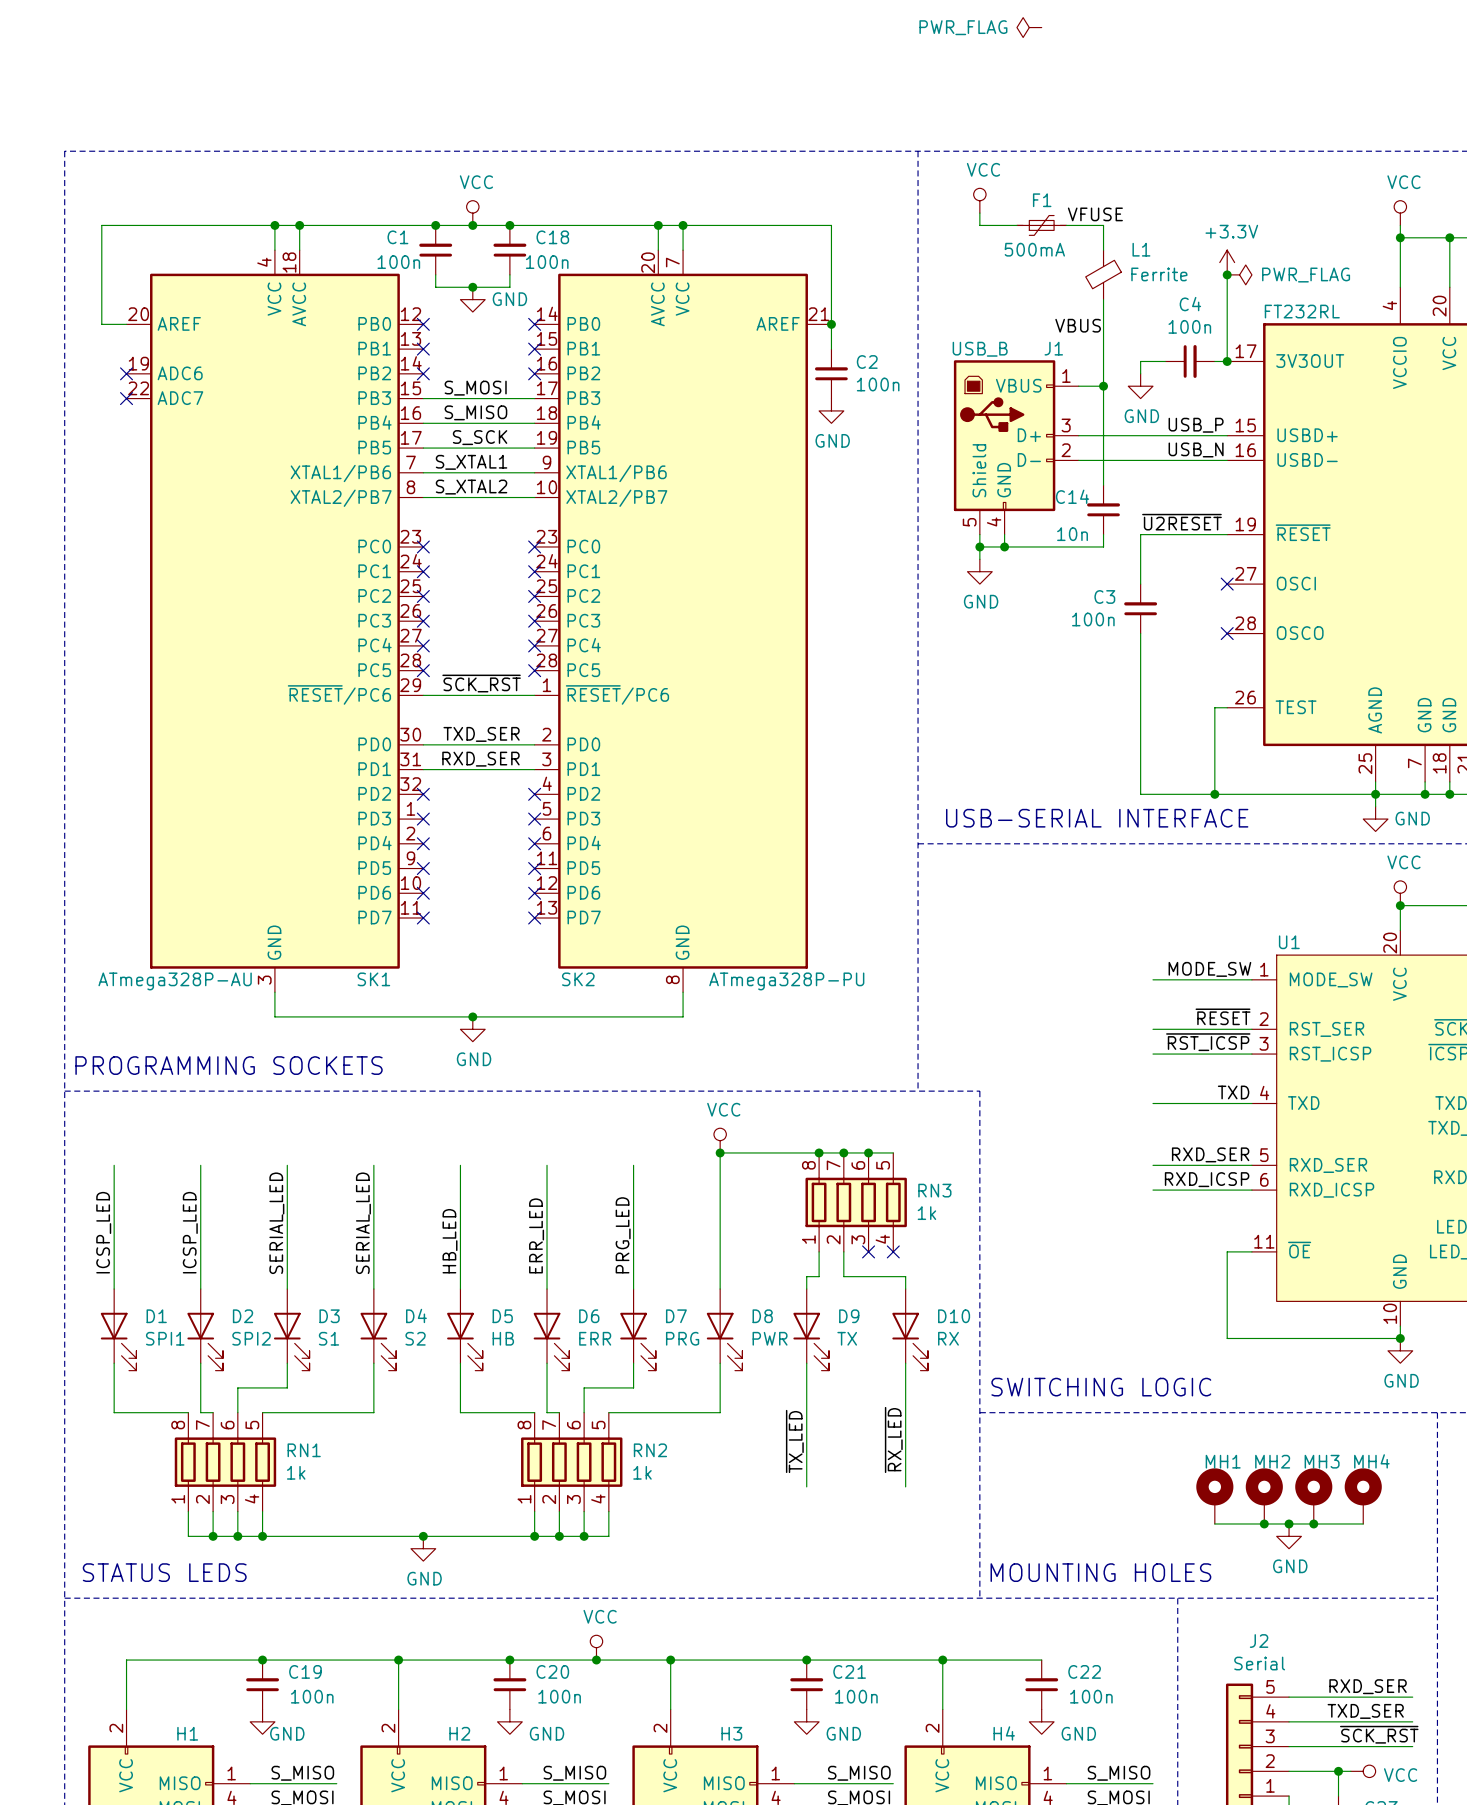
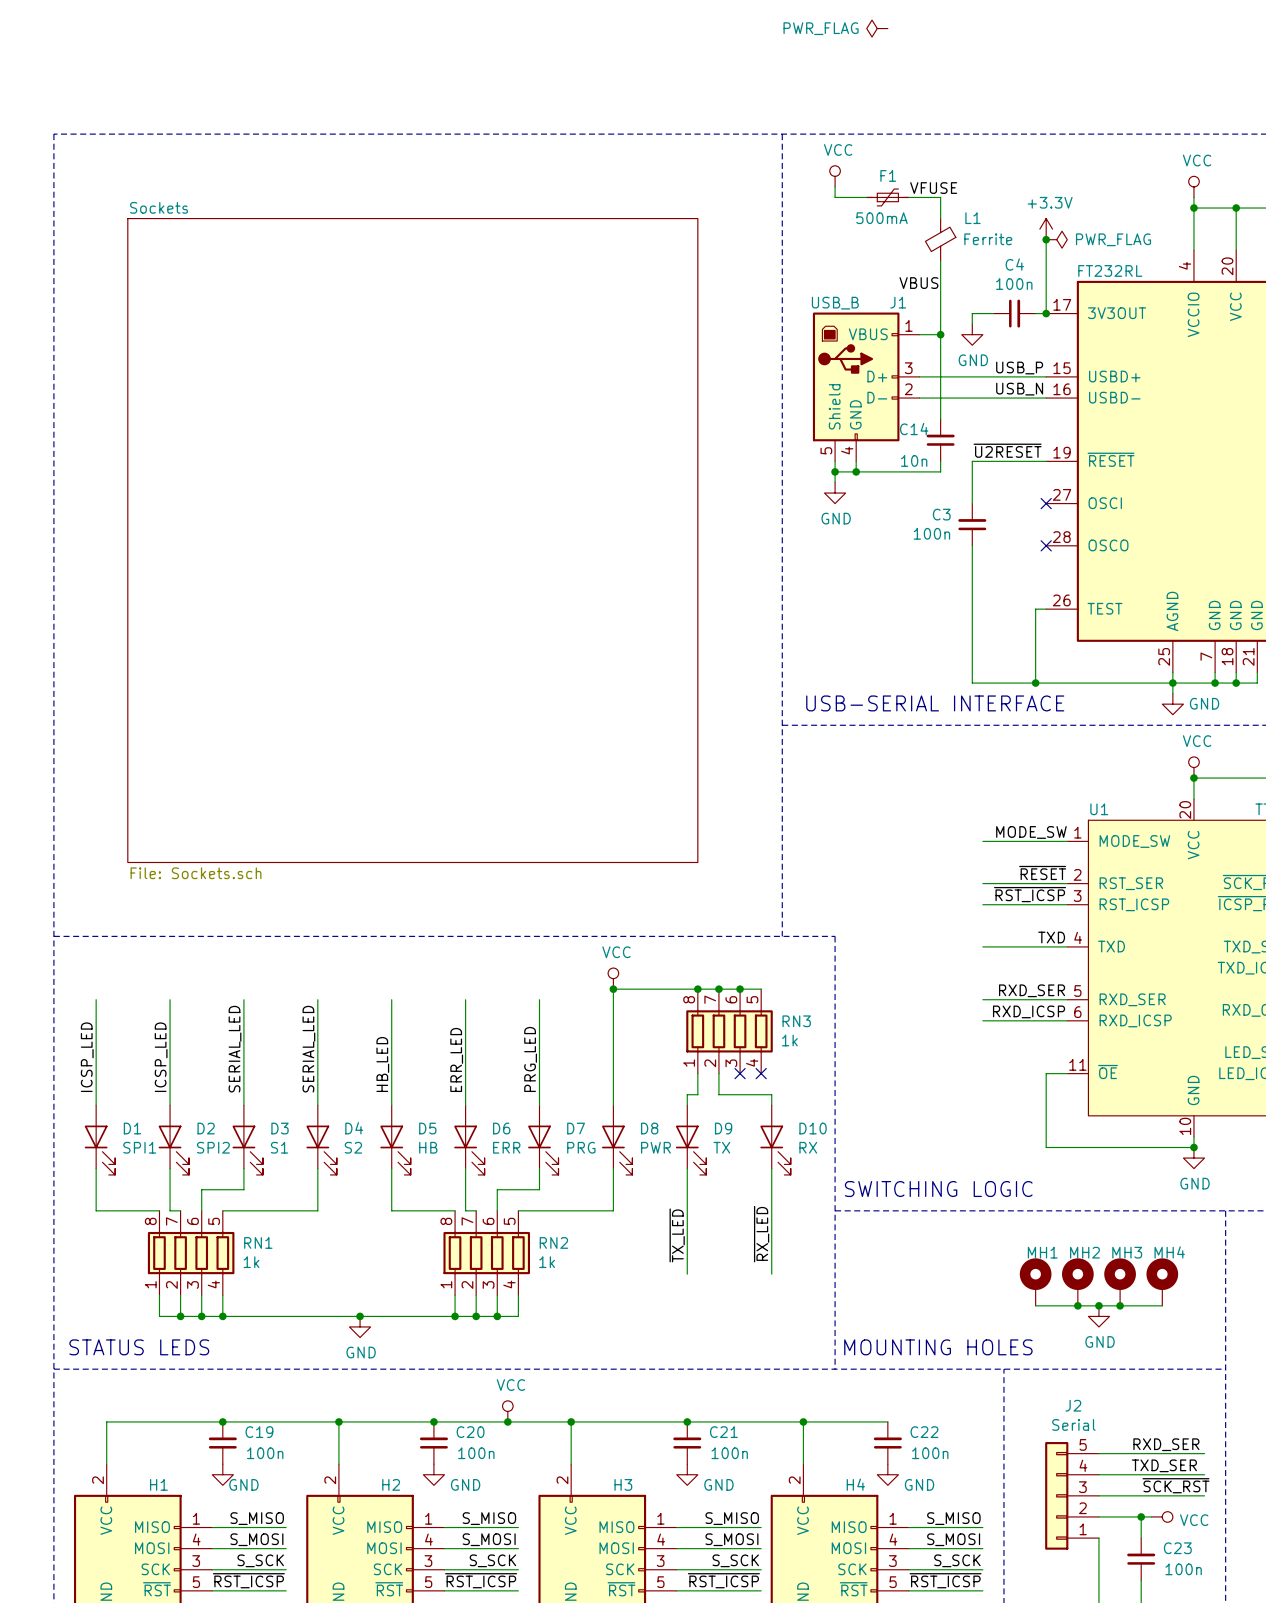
power symbol: VCC (472, 213) -> none
wire: (274, 225) (274, 250) -> none
junction: (274, 225) -> none
wire: (299, 225) (299, 250) -> none
junction: (299, 225) -> none
junction: (435, 225) -> none
junction: (472, 225) -> none
junction: (509, 225) -> none
wire: (658, 225) (658, 250) -> none
junction: (658, 225) -> none
wire: (683, 225) (683, 250) -> none
junction: (683, 225) -> none
C1: 100n (435, 250) -> none
C18: 100n (509, 250) -> none
wire: (435, 274) (435, 287) (509, 287) (509, 274) -> none
junction: (472, 287) -> none
power symbol: GND (472, 299) -> none
wire: (126, 324) (101, 324) (101, 225) (831, 225) (831, 349) -> none
no-connect mark: (423, 324) -> none
no-connect mark: (534, 324) -> none
junction: (831, 324) -> none
no-connect mark: (423, 349) -> none
no-connect mark: (534, 349) -> none
no-connect mark: (126, 373) -> none
no-connect mark: (423, 373) -> none
no-connect mark: (534, 373) -> none
C2: 100n (831, 373) -> none
label: S_MOSI (475, 388) -> none
no-connect mark: (126, 398) -> none
wire: (423, 398) (534, 398) -> none
power symbol: GND (831, 410) -> none
label: S_MISO (475, 412) -> none
wire: (423, 423) (534, 423) -> none
label: S_SCK (480, 437) -> none
wire: (423, 448) (534, 448) -> none
label: S_XTAL1 (471, 462) -> none
wire: (423, 472) (534, 472) -> none
label: S_XTAL2 (471, 487) -> none
wire: (423, 497) (534, 497) -> none
no-connect mark: (423, 546) -> none
no-connect mark: (534, 546) -> none
no-connect mark: (423, 571) -> none
no-connect mark: (534, 571) -> none
no-connect mark: (423, 596) -> none
no-connect mark: (534, 596) -> none
SK1: ATmega328P-AU (274, 621) -> none
no-connect mark: (423, 621) -> none
no-connect mark: (534, 621) -> none
SK2: ATmega328P-PU (683, 621) -> none
sheet Sockets: none -> File: Sockets.sch (412, 540)
no-connect mark: (423, 645) -> none
no-connect mark: (534, 645) -> none
no-connect mark: (423, 670) -> none
no-connect mark: (534, 670) -> none
label: ~{SCK_RST} (481, 683) -> none
wire: (423, 695) (534, 695) -> none
label: TXD_SER (481, 734) -> none
wire: (423, 744) (534, 744) -> none
label: RXD_SER (480, 759) -> none
wire: (423, 769) (534, 769) -> none
no-connect mark: (423, 794) -> none
no-connect mark: (534, 794) -> none
no-connect mark: (423, 819) -> none
no-connect mark: (534, 819) -> none
no-connect mark: (423, 843) -> none
no-connect mark: (534, 843) -> none
no-connect mark: (423, 868) -> none
no-connect mark: (534, 868) -> none
no-connect mark: (423, 893) -> none
no-connect mark: (534, 893) -> none
no-connect mark: (423, 918) -> none
no-connect mark: (534, 918) -> none
wire: (274, 992) (274, 1016) (683, 1016) (683, 992) -> none
junction: (472, 1016) -> none
power symbol: GND (472, 1029) -> none
text: PROGRAMMING SOCKETS (229, 1065) -> none

